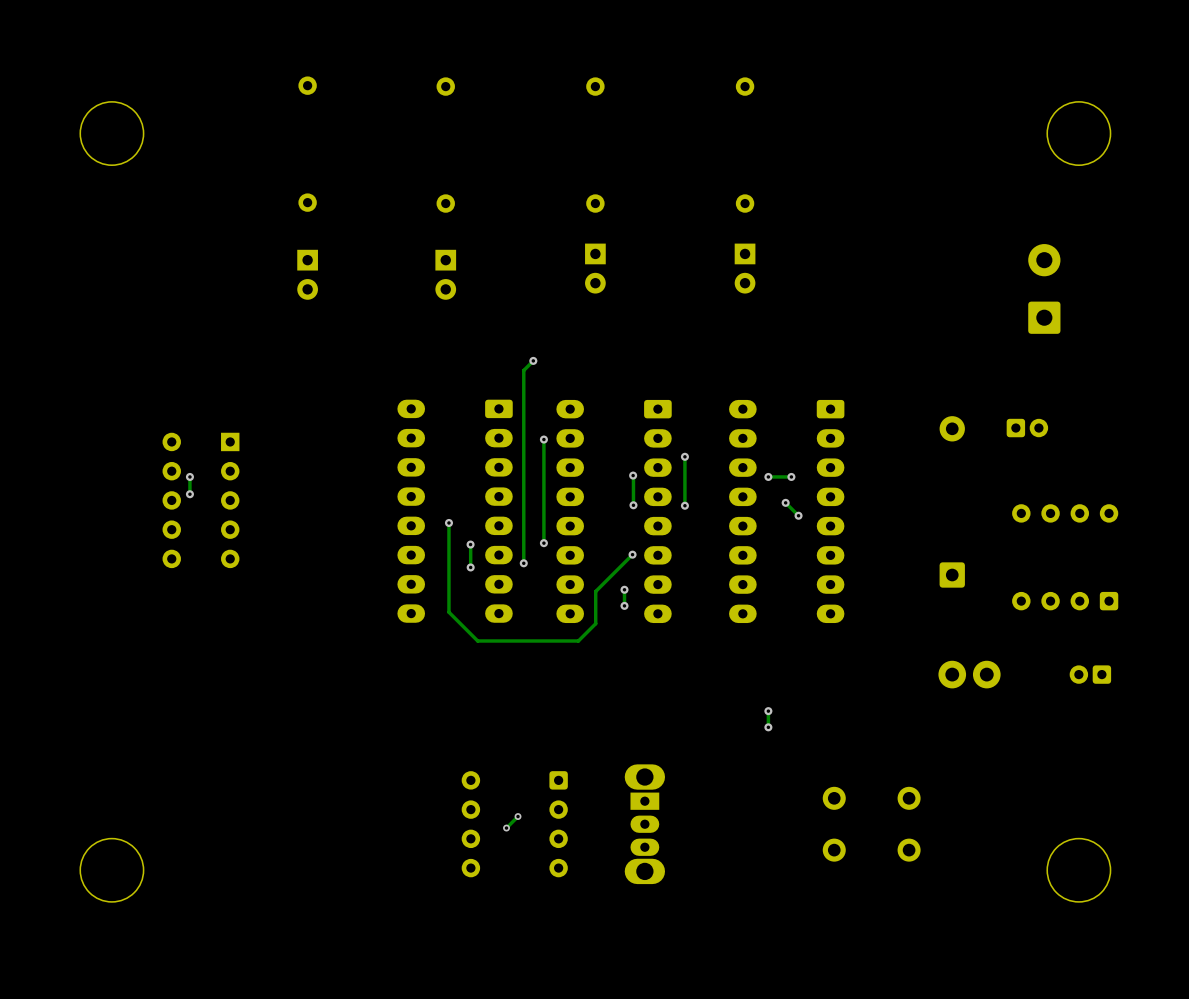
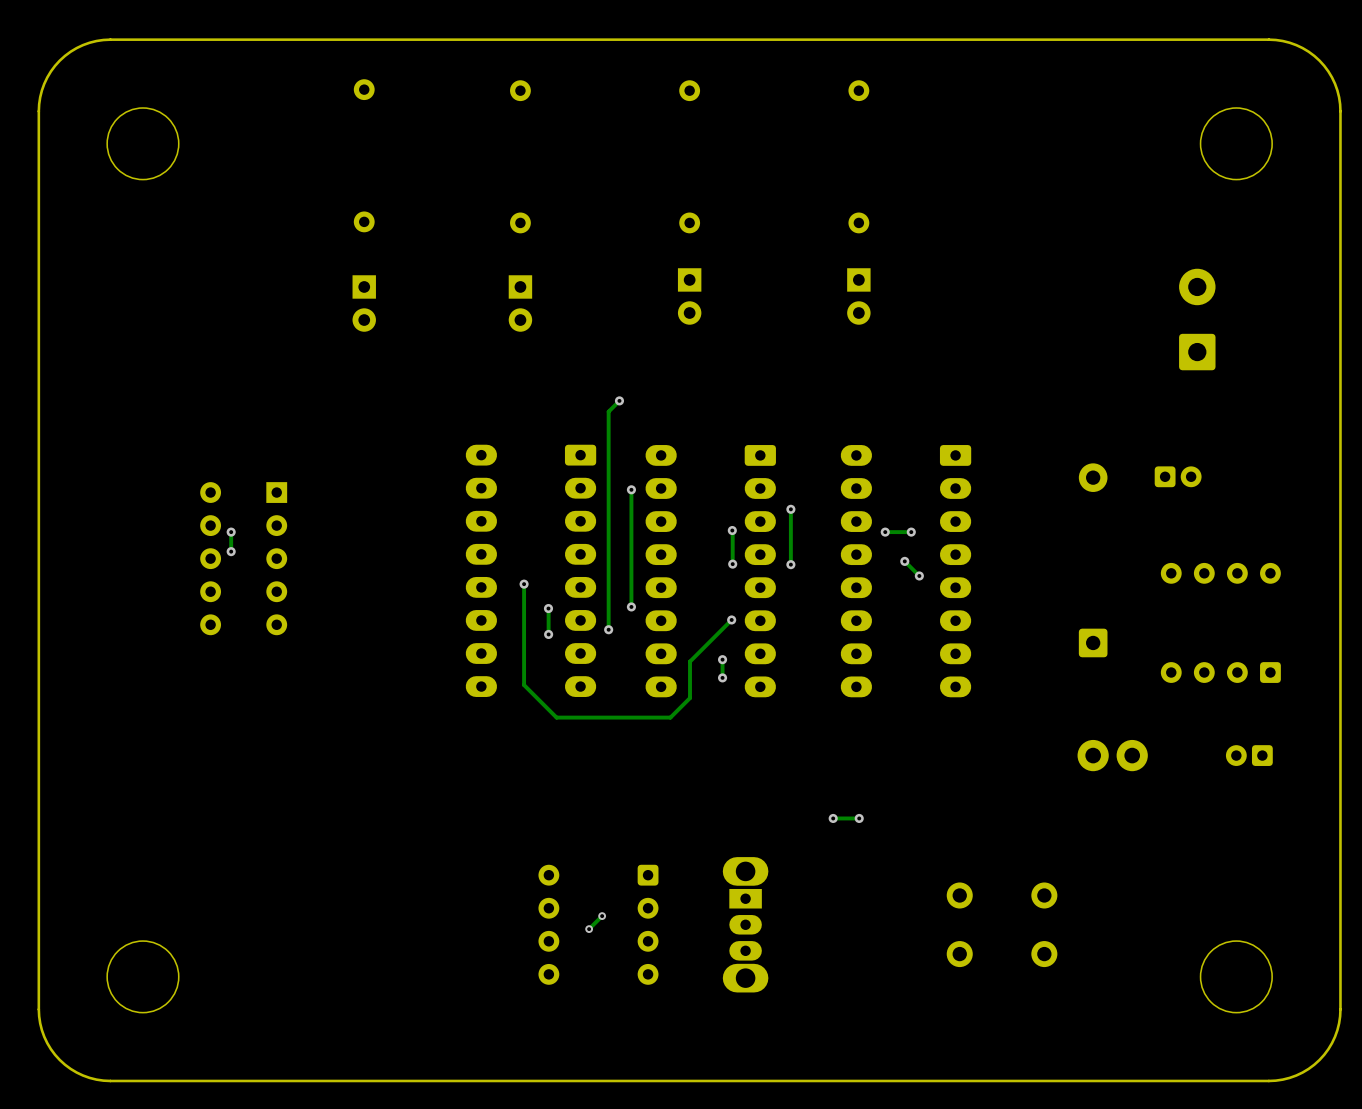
board edge: none -> (1268, 39) (110, 39) (89, 42) (65, 55) (50, 71) (44, 83) (38, 111) (38, 1009) (44, 1036) (55, 1054) (70, 1068) (83, 1075) (110, 1080) (1268, 1080) (1296, 1075) (1314, 1064) (1332, 1043) (1337, 1030) (1340, 1009) (1340, 111) (1335, 83) (1319, 60) (1296, 45) (1268, 39)
track: (768, 711) (768, 727) -> none
via: (768, 711) -> none
via: (768, 727) -> none
via: none -> (833, 818)
track: none -> (859, 818) (833, 818)
via: none -> (859, 818)

